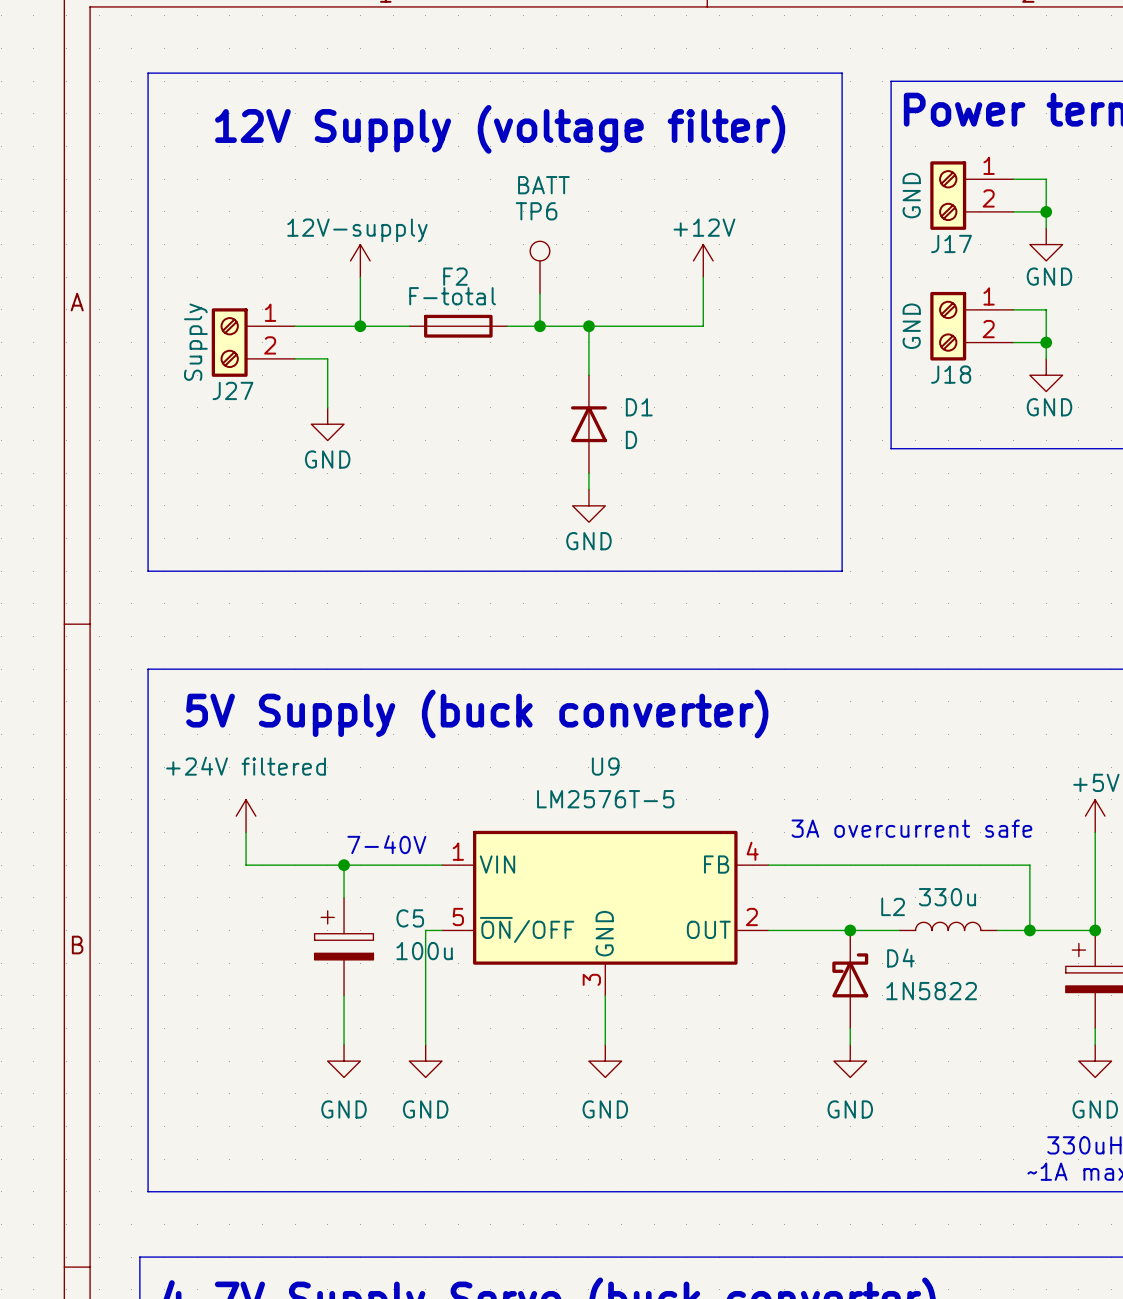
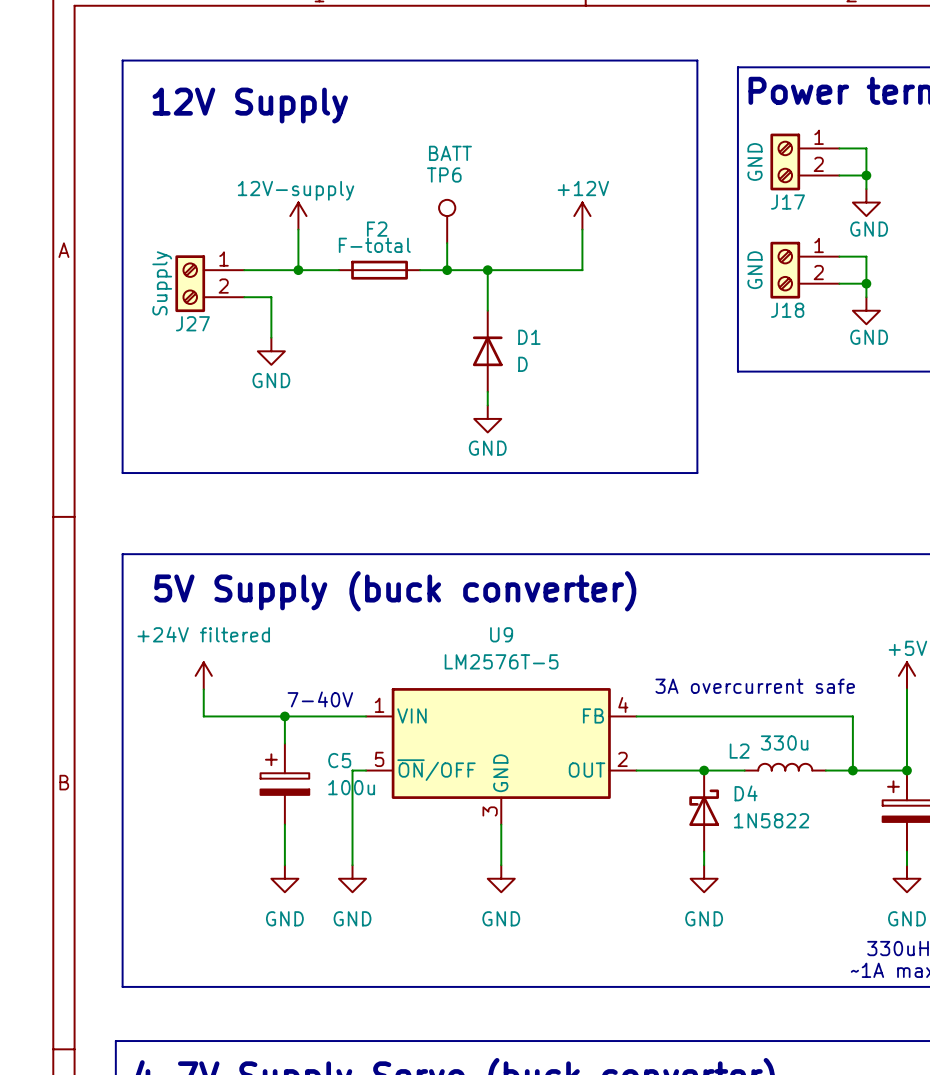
text: none -> 12V Supply (250, 105)
text: 12V Supply (voltage filter) (500, 129) -> none

